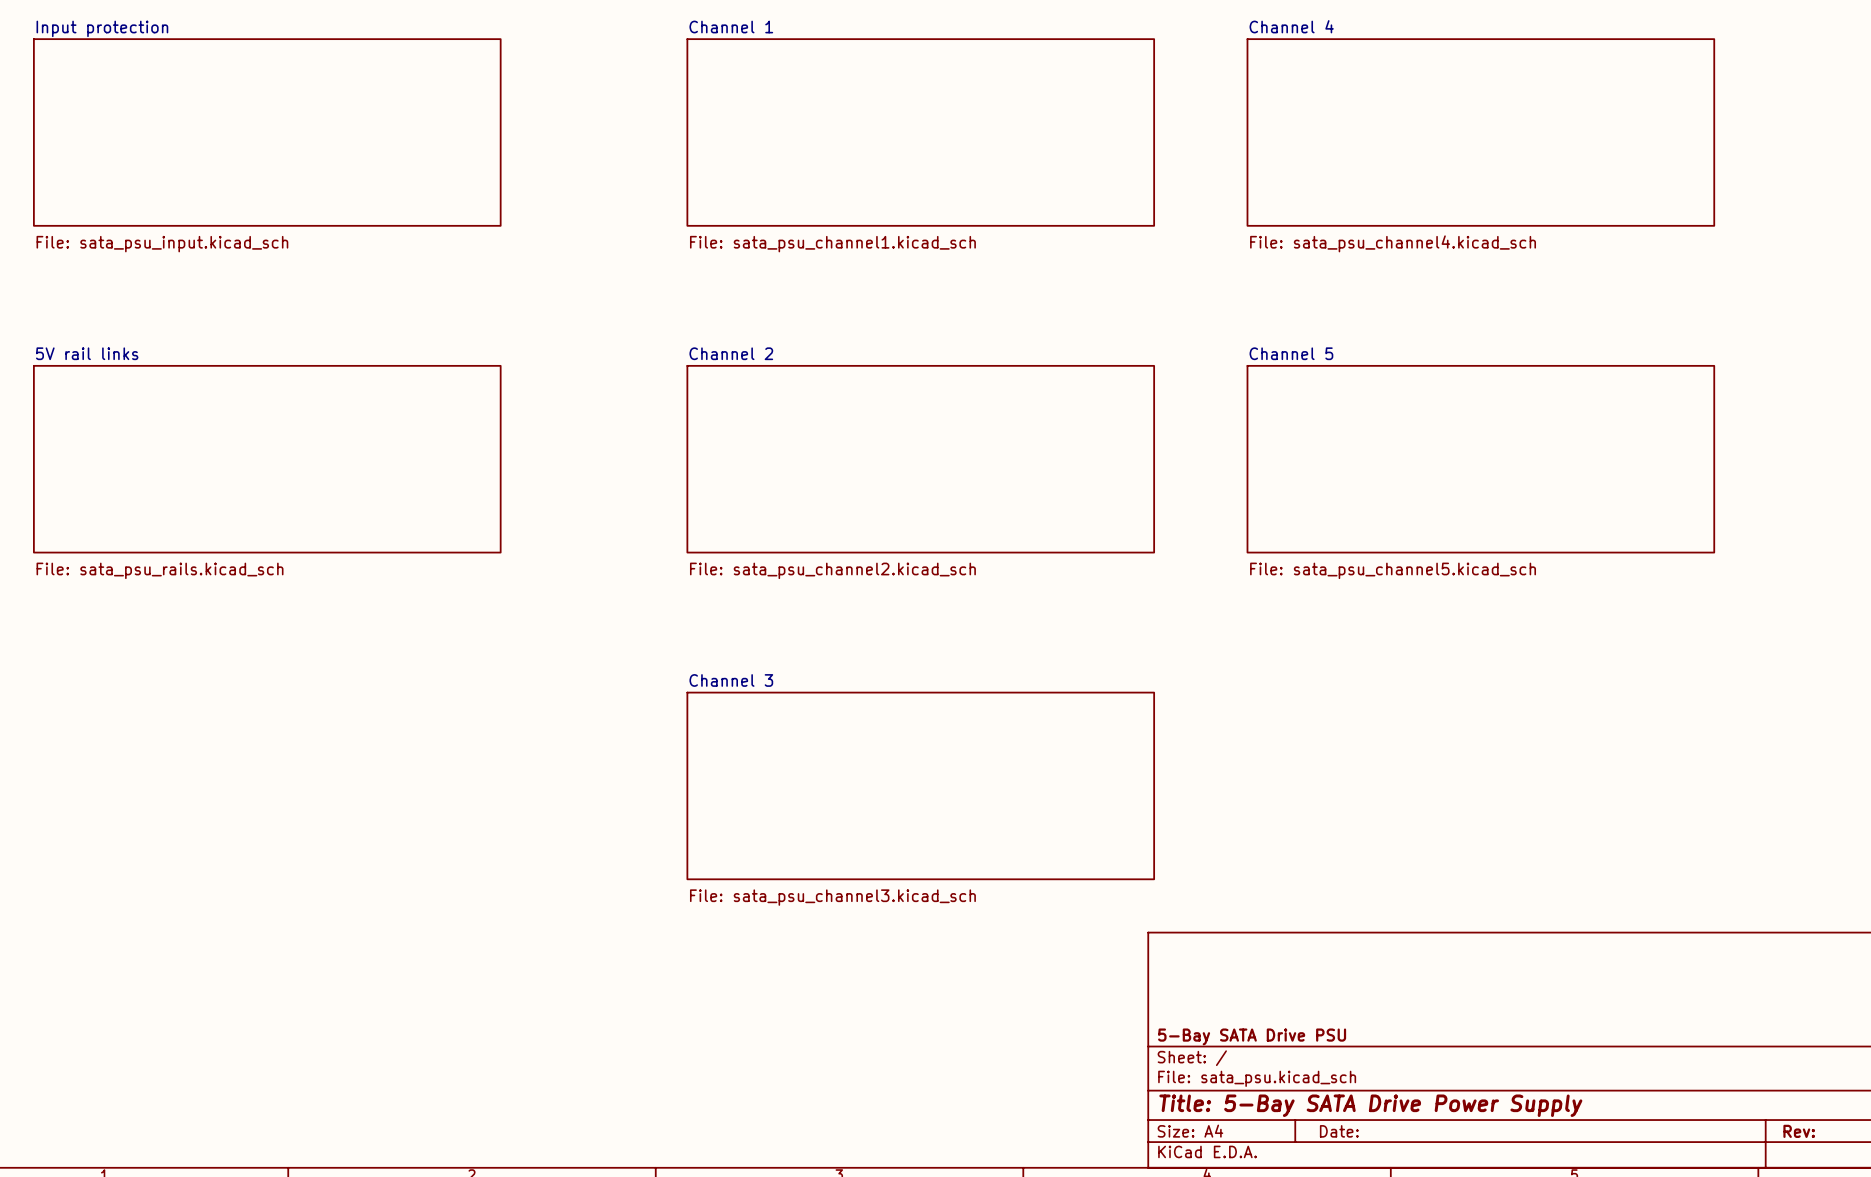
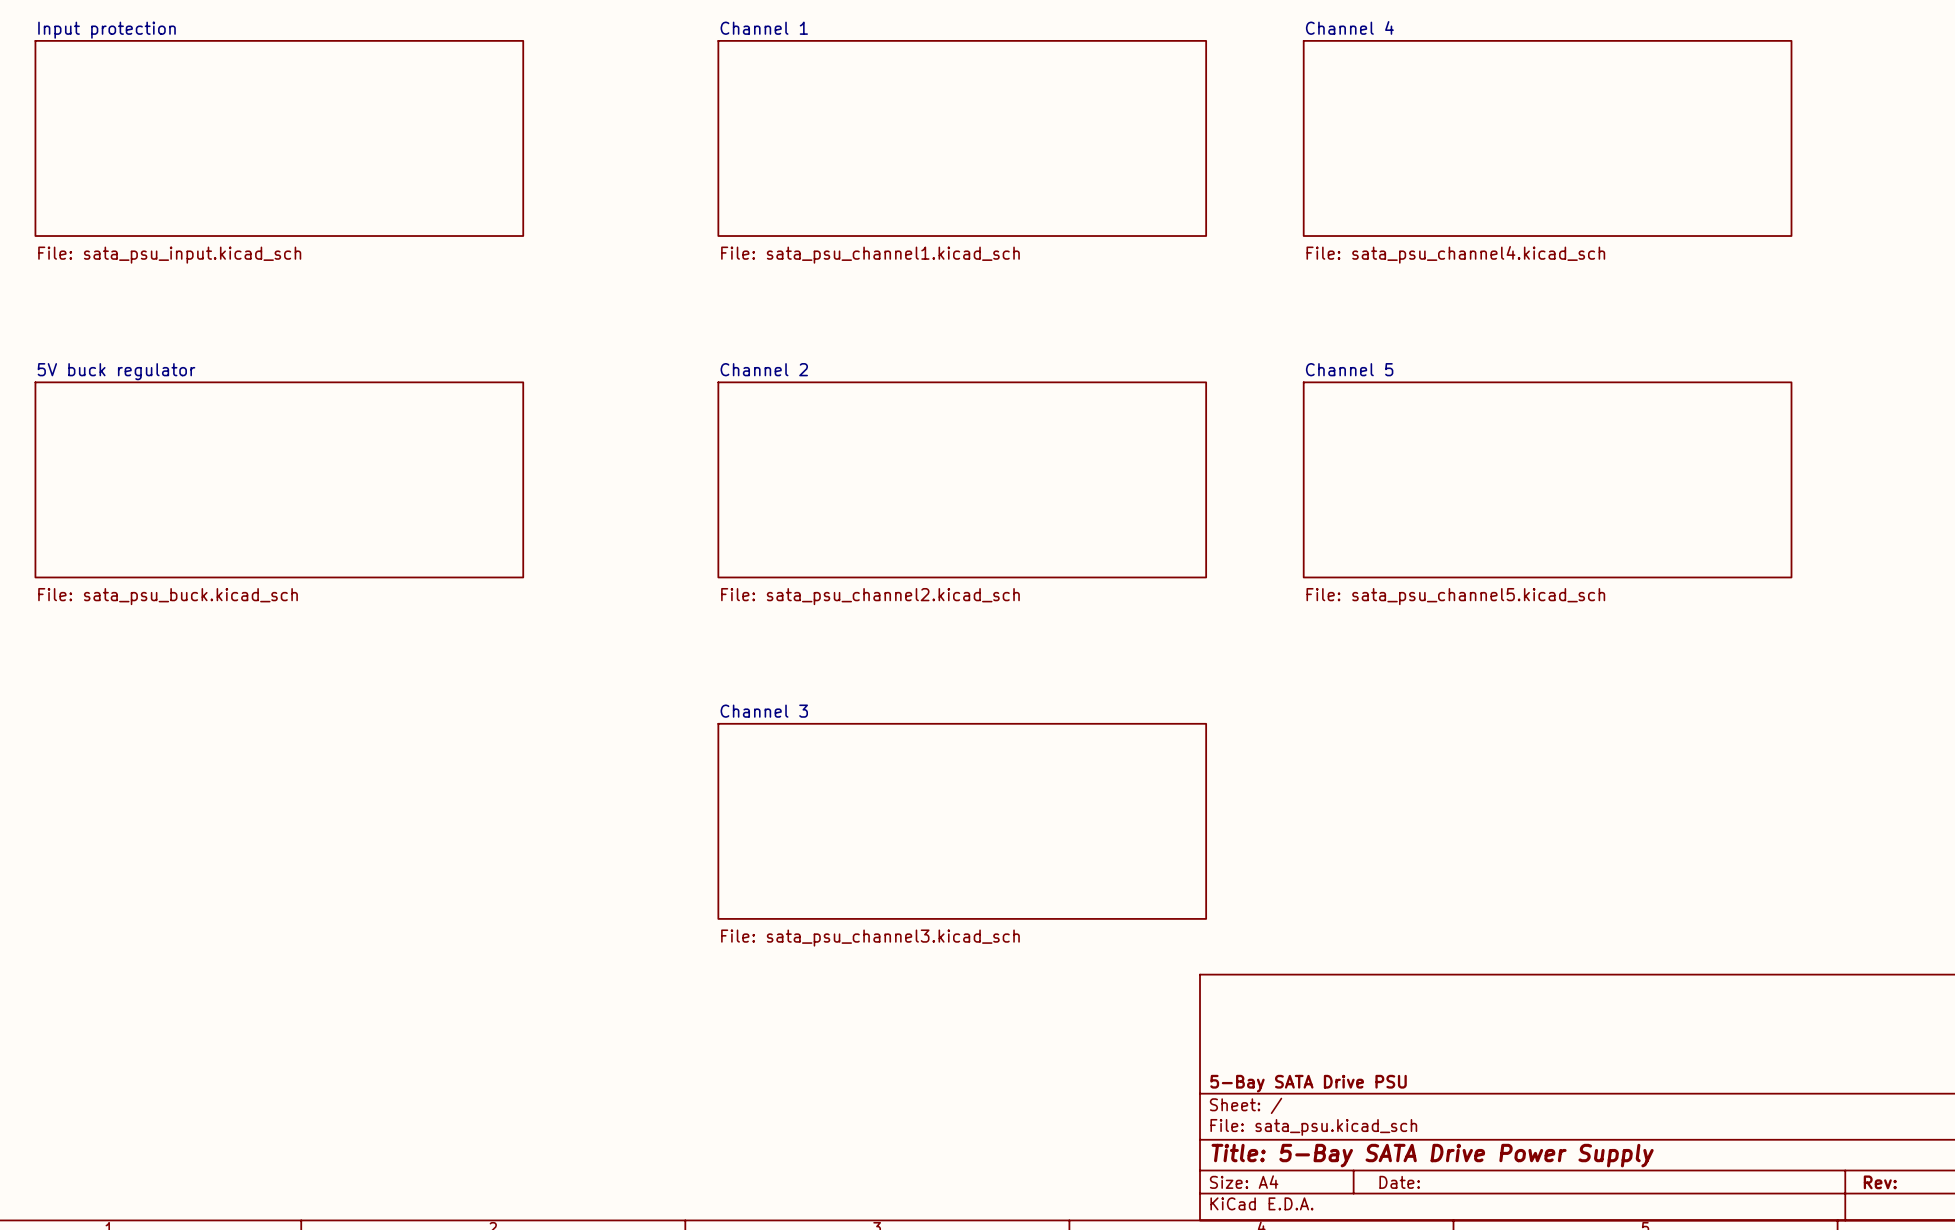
sheet 5V rail links name: 5V rail links (87, 353) -> 5V buck regulator (116, 371)
sheet 5V rail links value: File: sata_psu_rails.kicad_sch (160, 570) -> File: sata_psu_buck.kicad_sch (168, 596)

